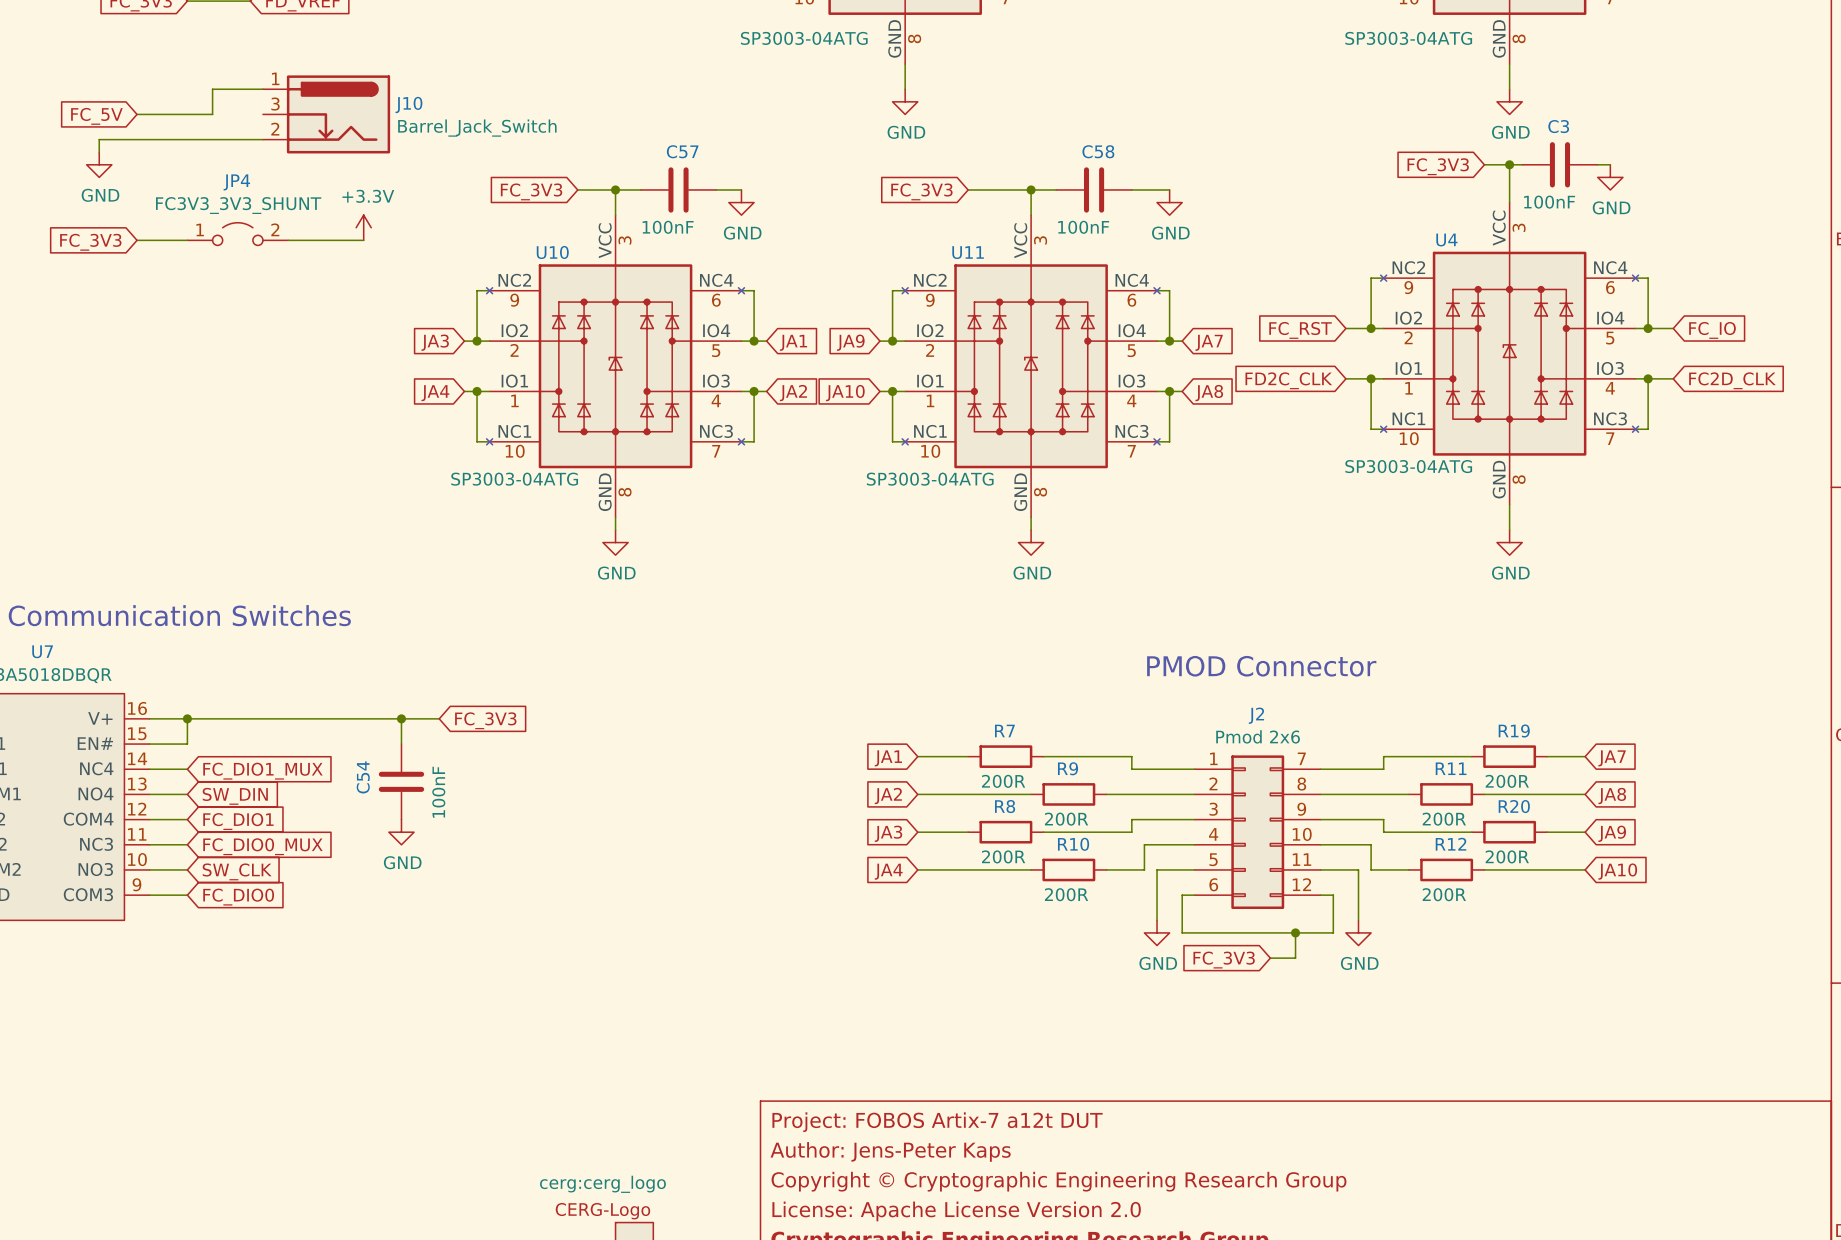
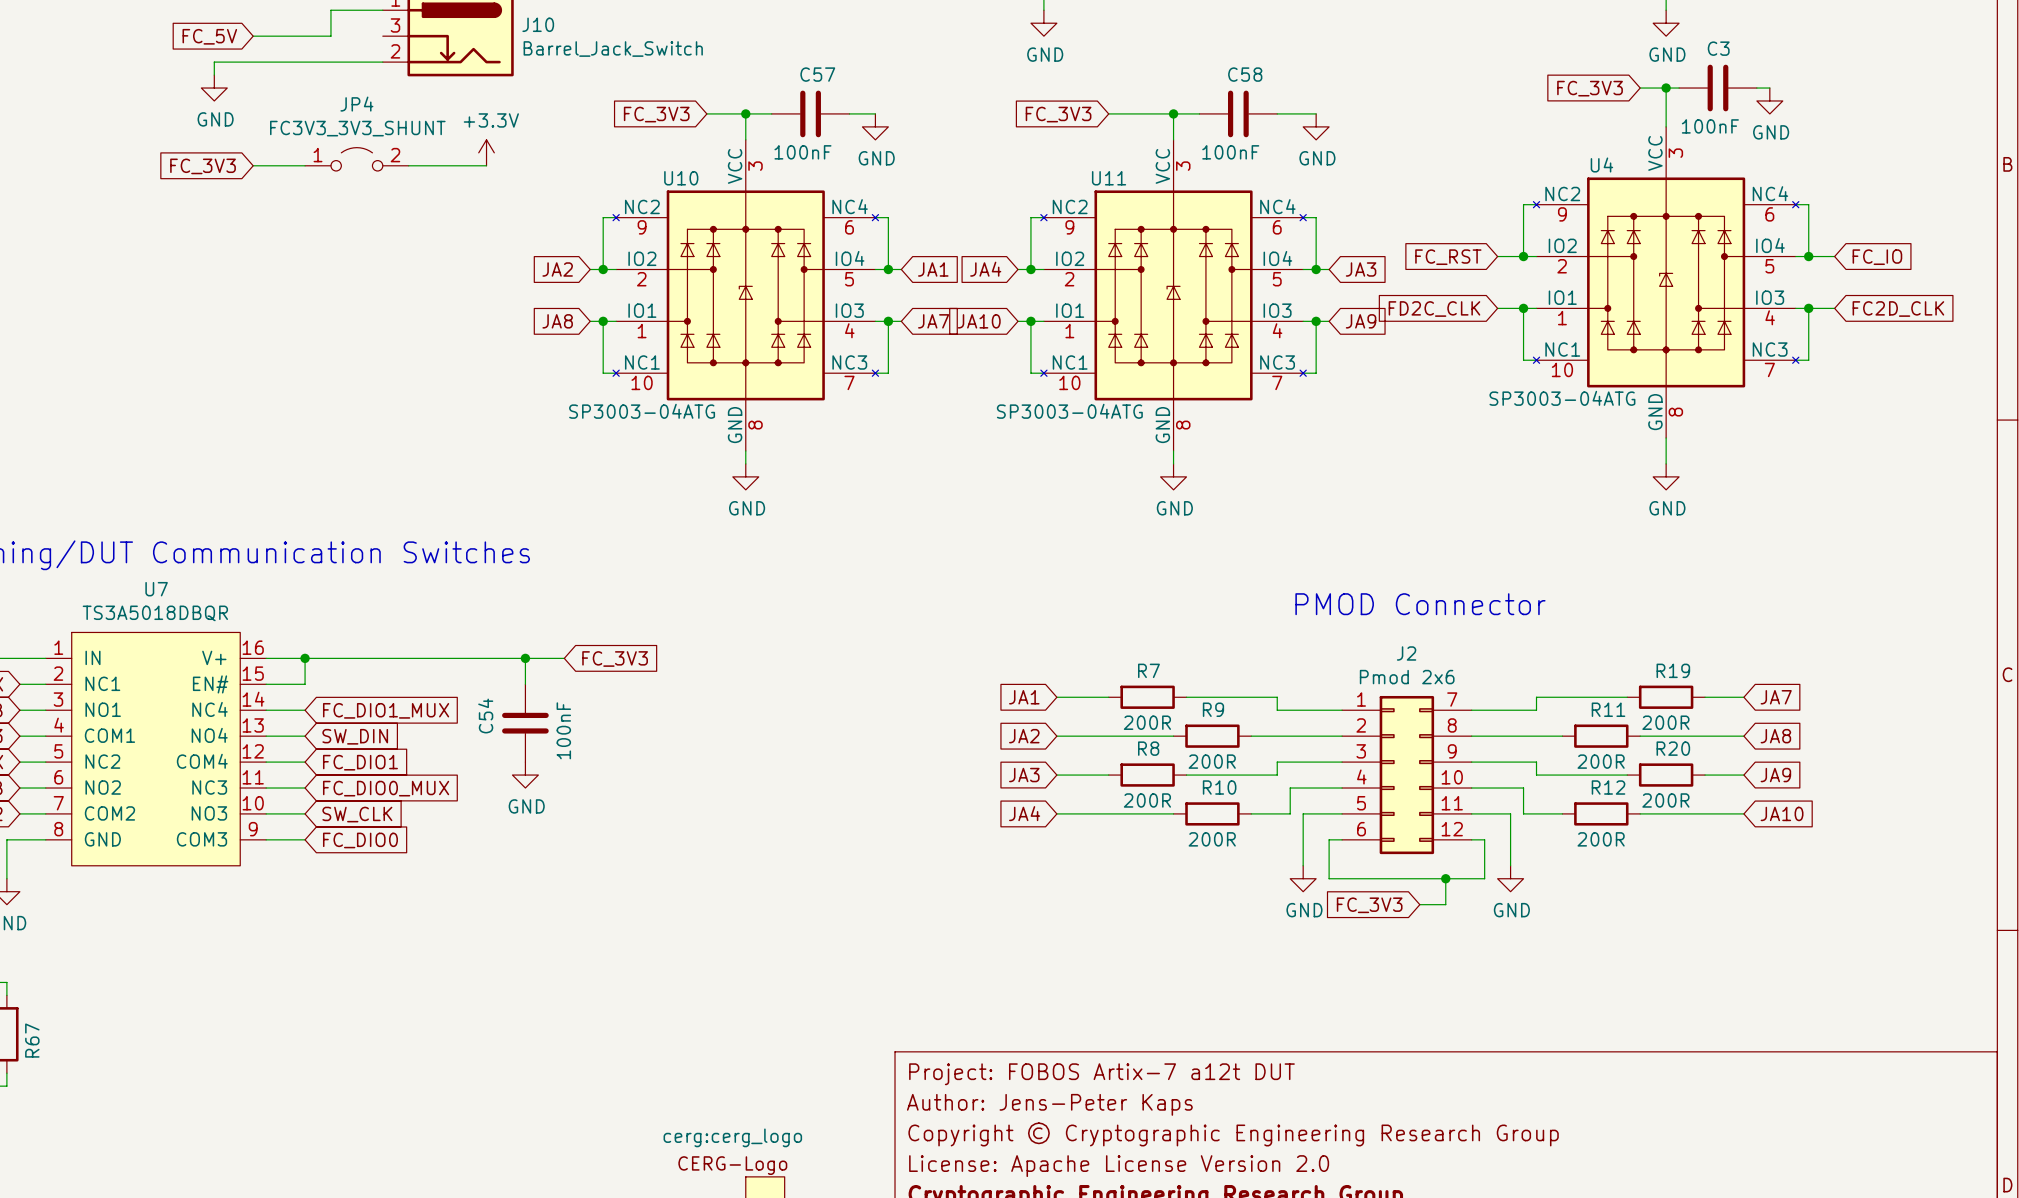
global label: JA3 (435, 342) -> JA2 (557, 269)
global label: JA9 (850, 342) -> JA4 (985, 269)
global label: JA7 (1209, 342) -> JA3 (1361, 269)
global label: JA4 (435, 393) -> JA8 (557, 321)
global label: JA2 (793, 393) -> JA7 (933, 321)
global label: JA8 (1209, 393) -> JA9 (1361, 321)

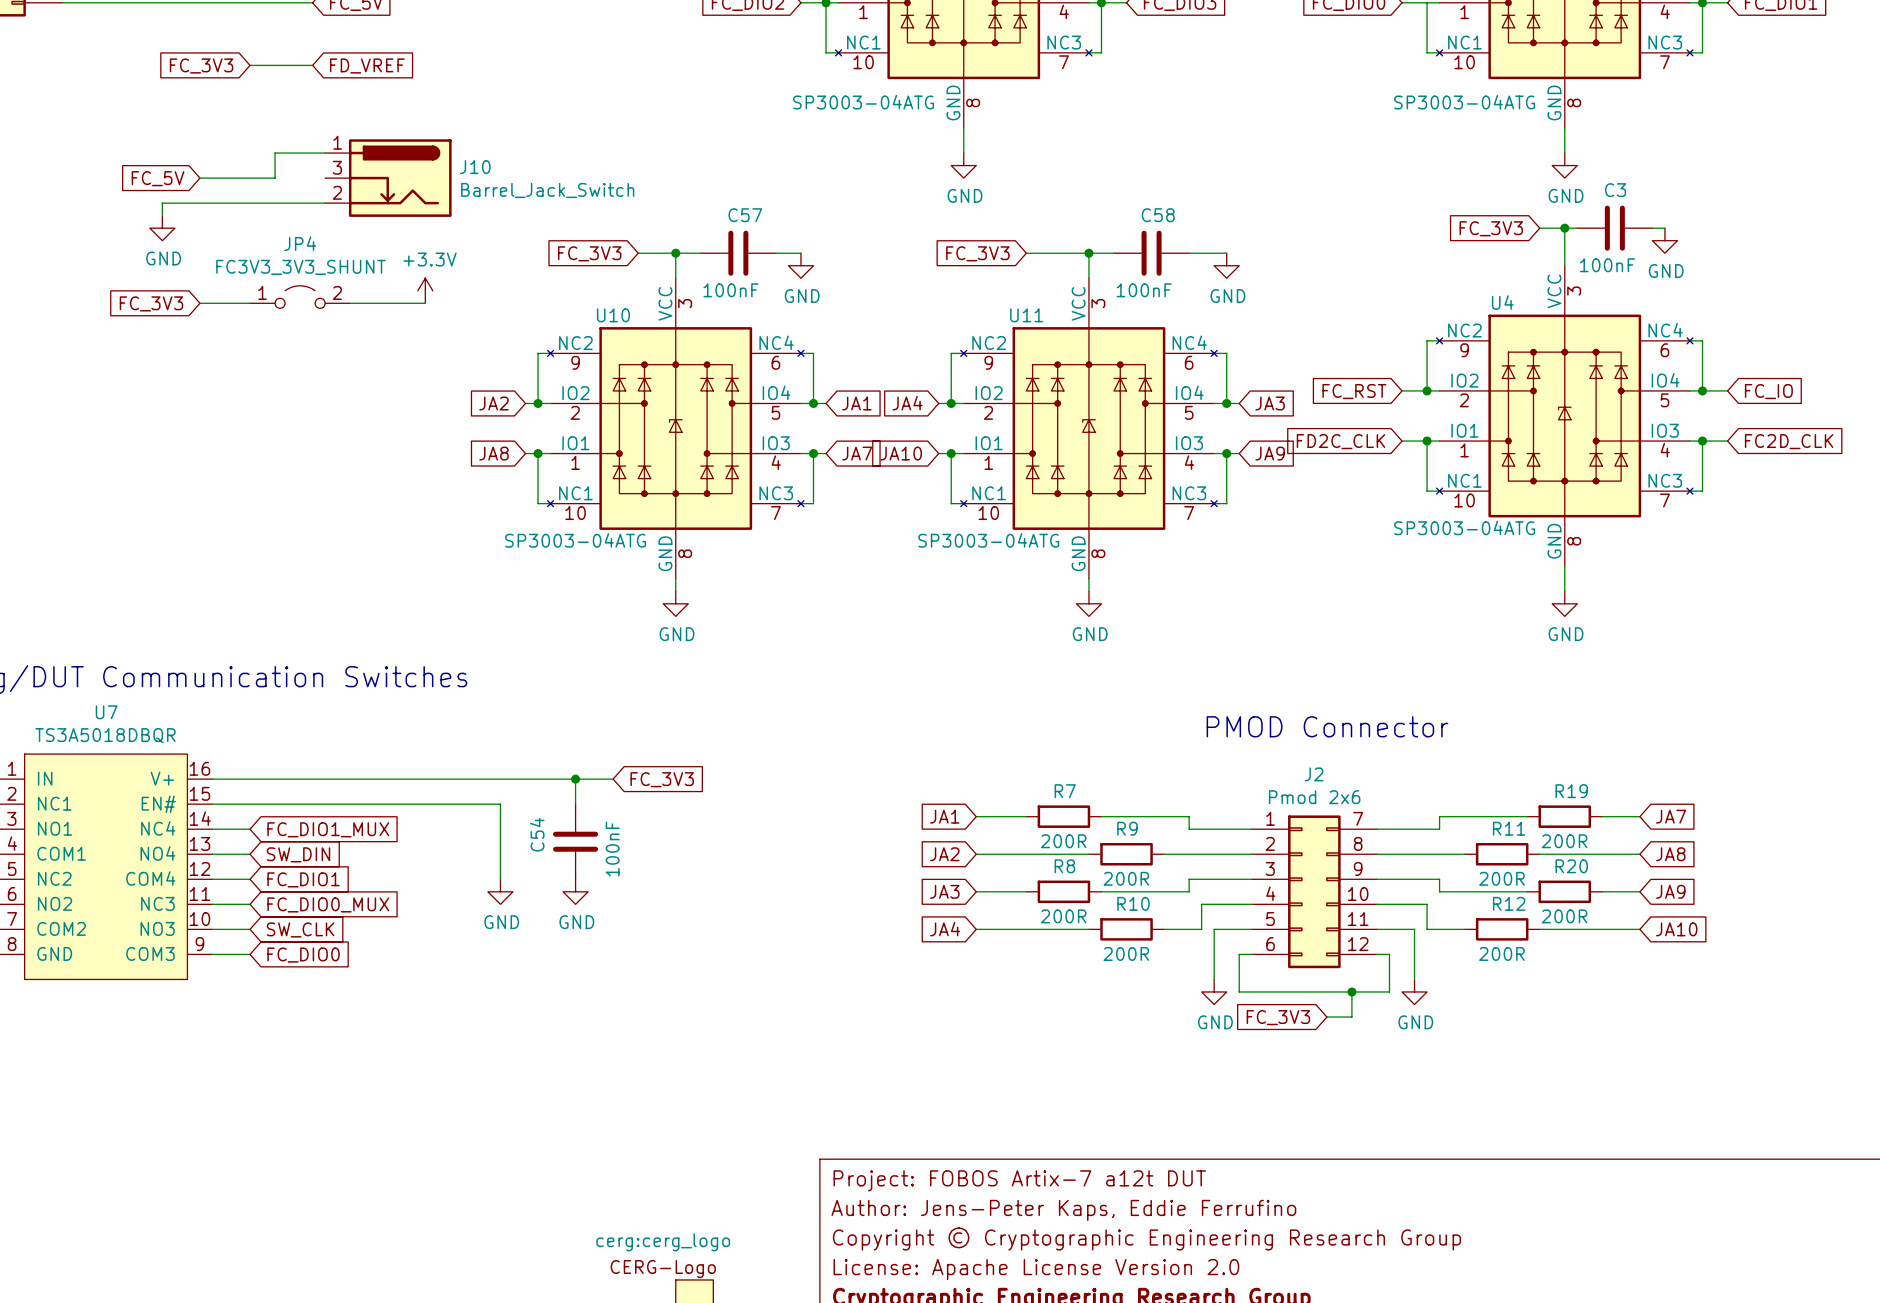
wire: (305, 658) (305, 684) -> (500, 879) (500, 804) (250, 804)
junction: (305, 658) -> none
wire: (525, 658) (525, 684) -> (575, 779) (575, 804)
junction: (525, 658) -> none
wire: none -> (500, 779) (613, 779)
global label position: FC_3V3 (615, 658) -> FC_3V3 (662, 779)
junction: none -> (575, 779)
C54 position: (525, 723) -> (575, 841)
power symbol position: GND (525, 775) -> GND (500, 891)
power symbol: none -> GND (575, 891)
title block: Author: Jens-Peter Kaps (1049, 1104) -> Author: Jens-Peter Kaps, Eddie Ferrufino (1063, 1210)

